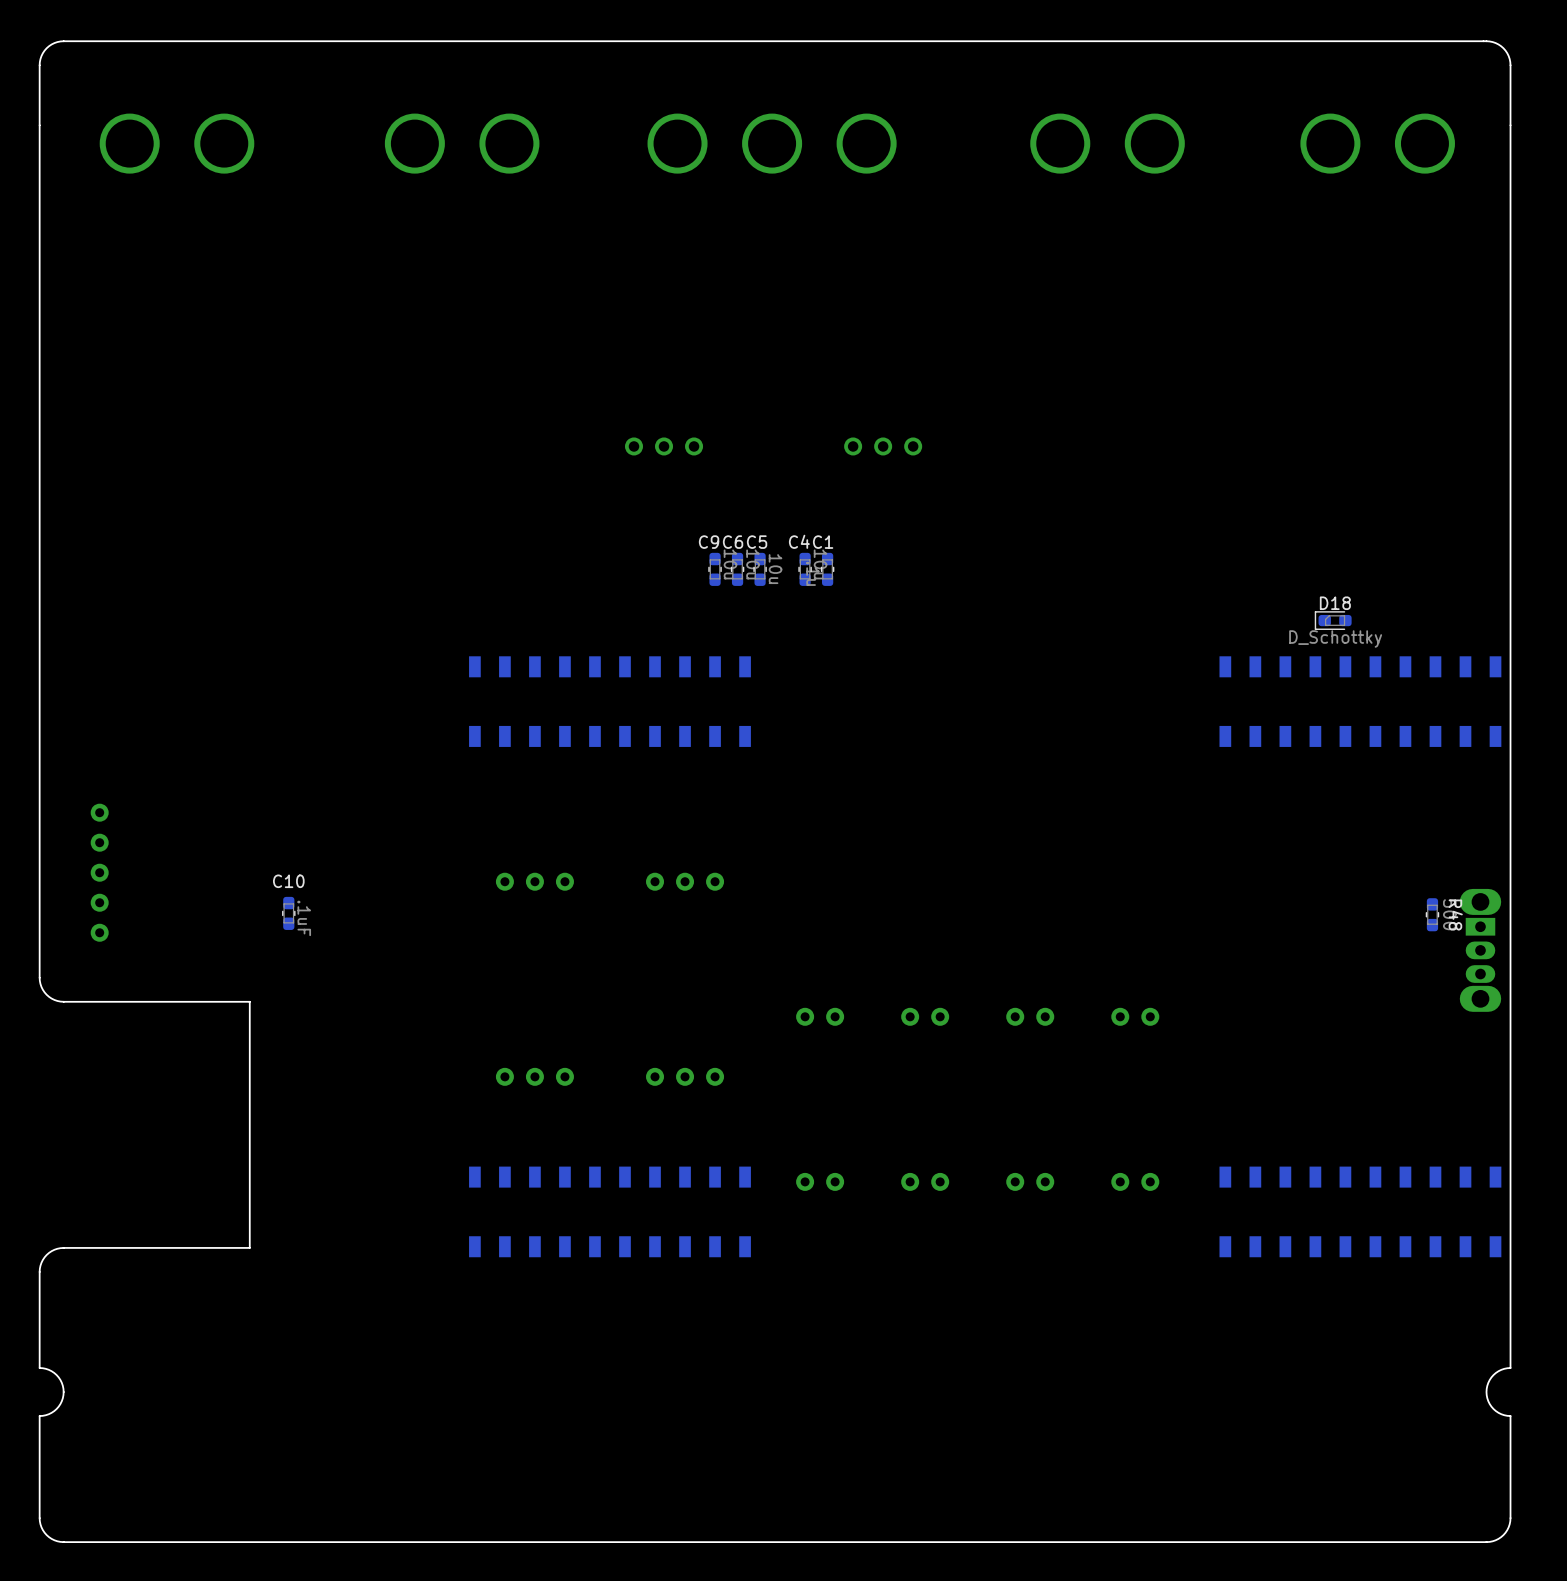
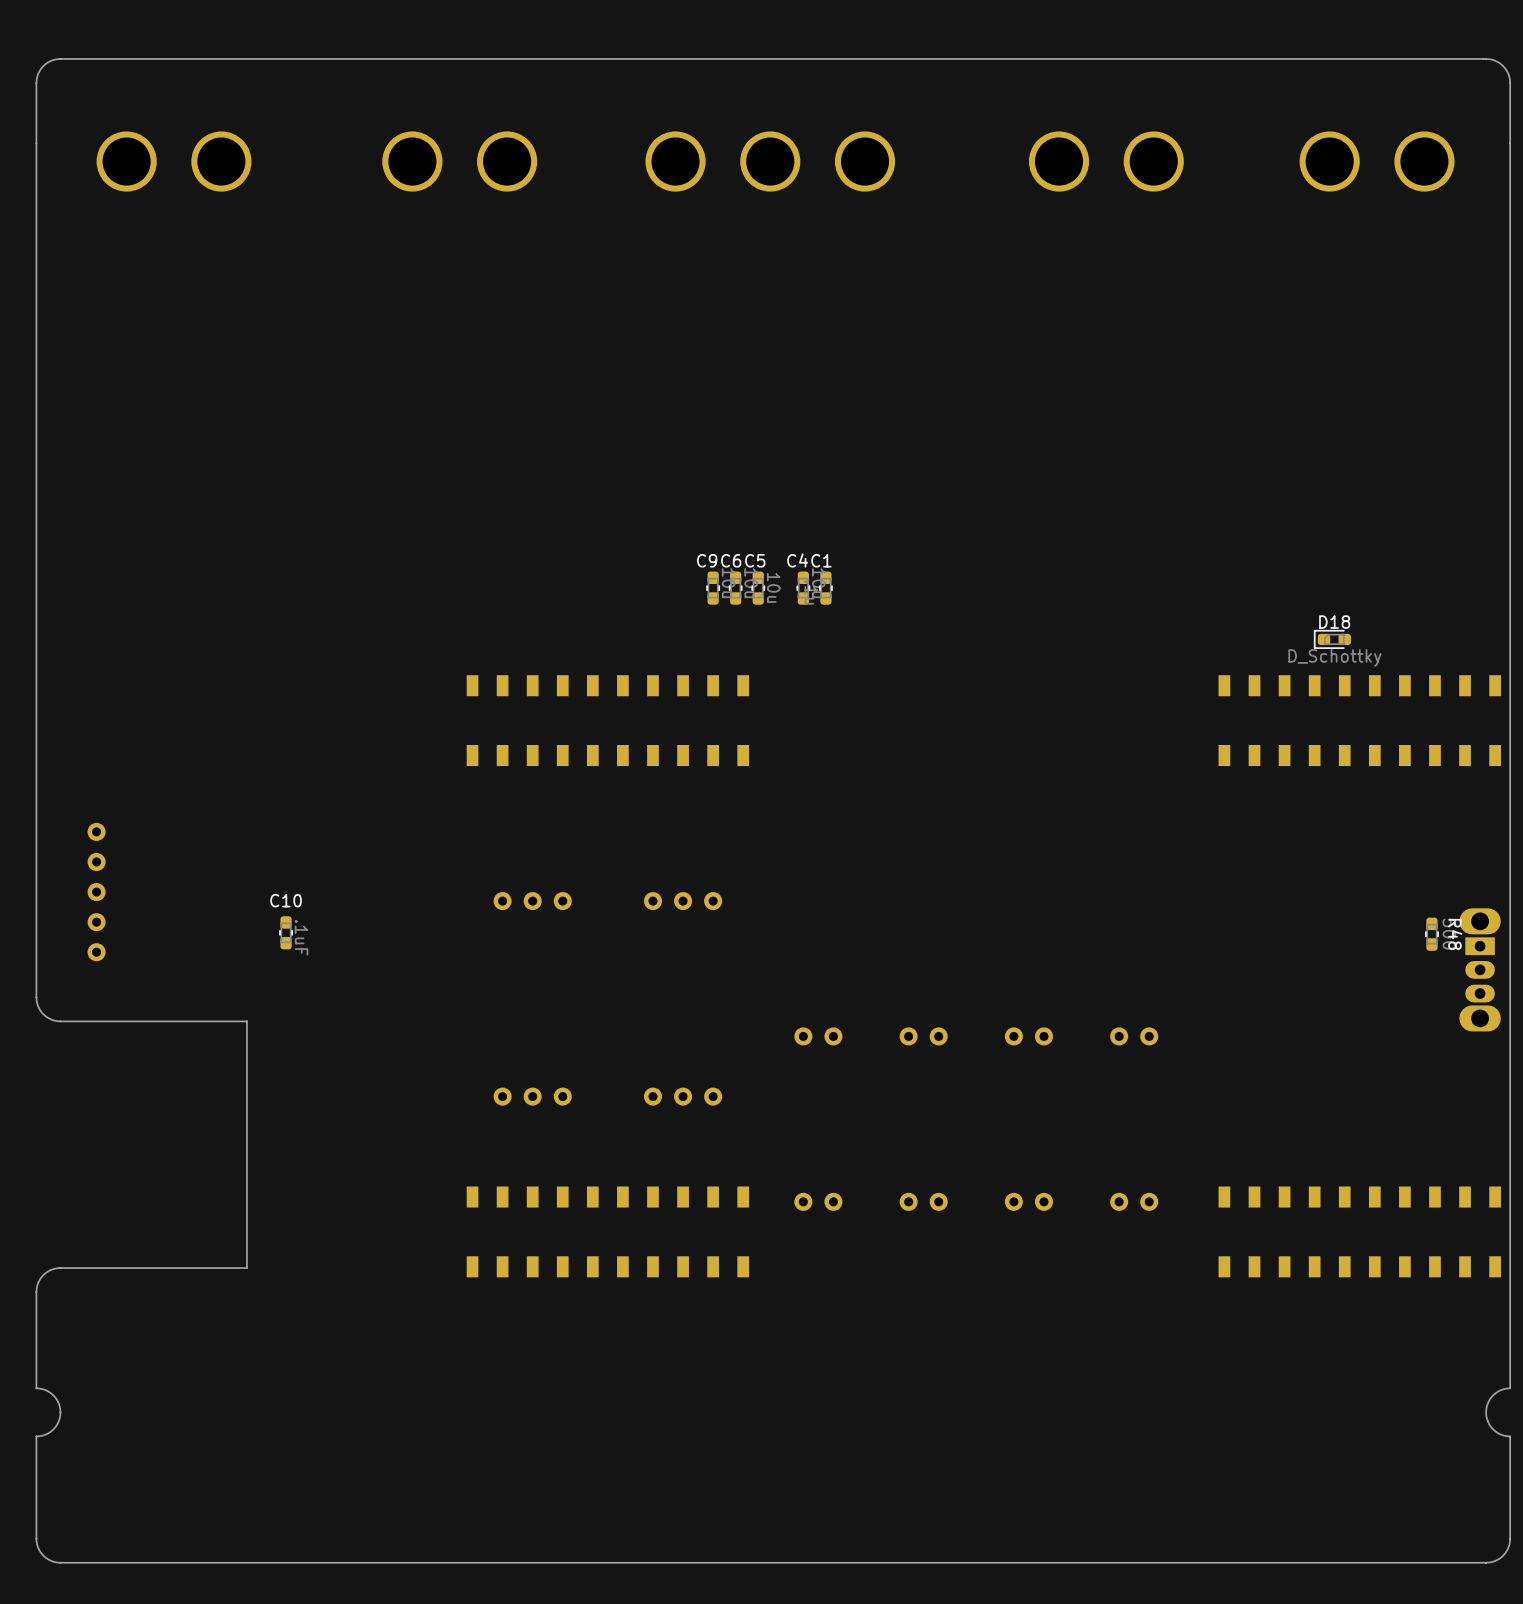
part: (664, 446) -> none
part: (883, 446) -> none

